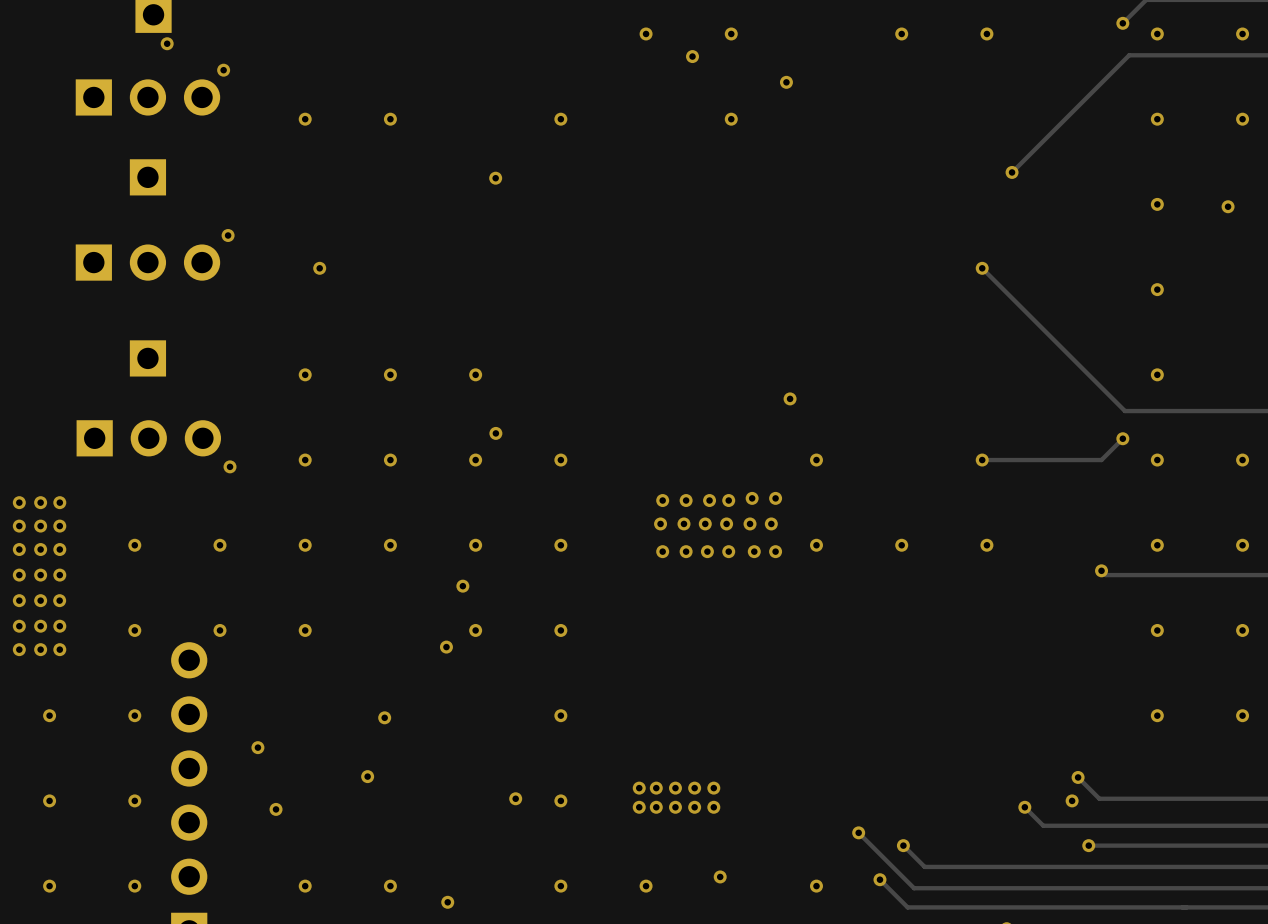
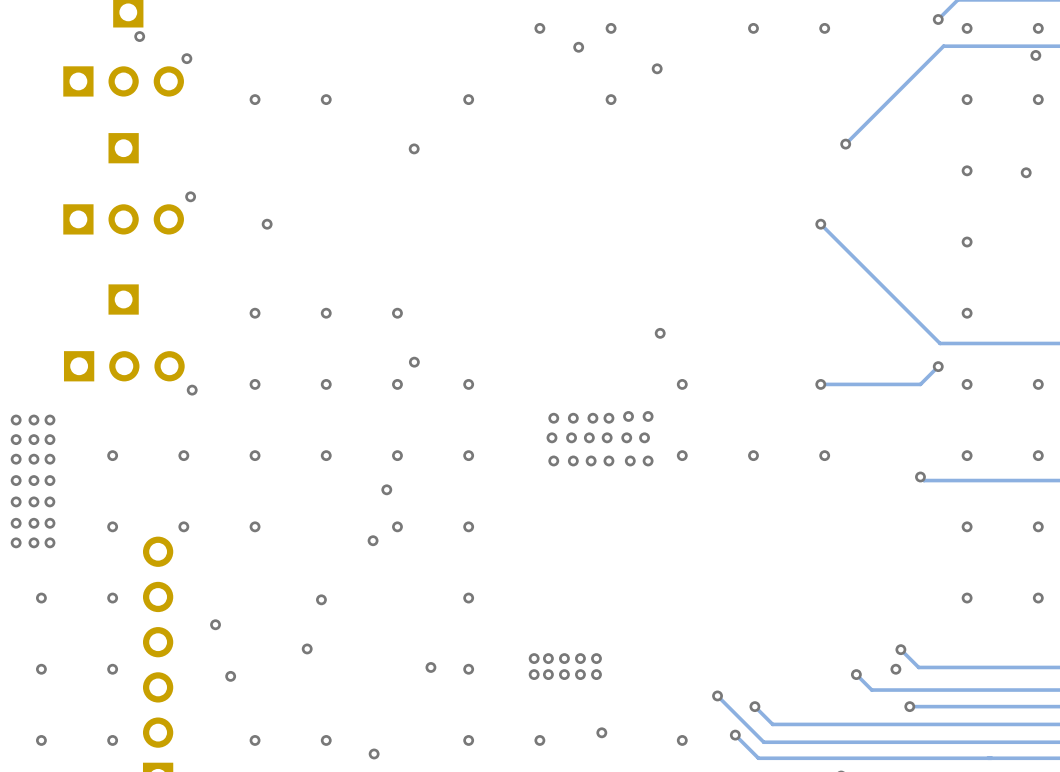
via: none -> (1035, 55)

